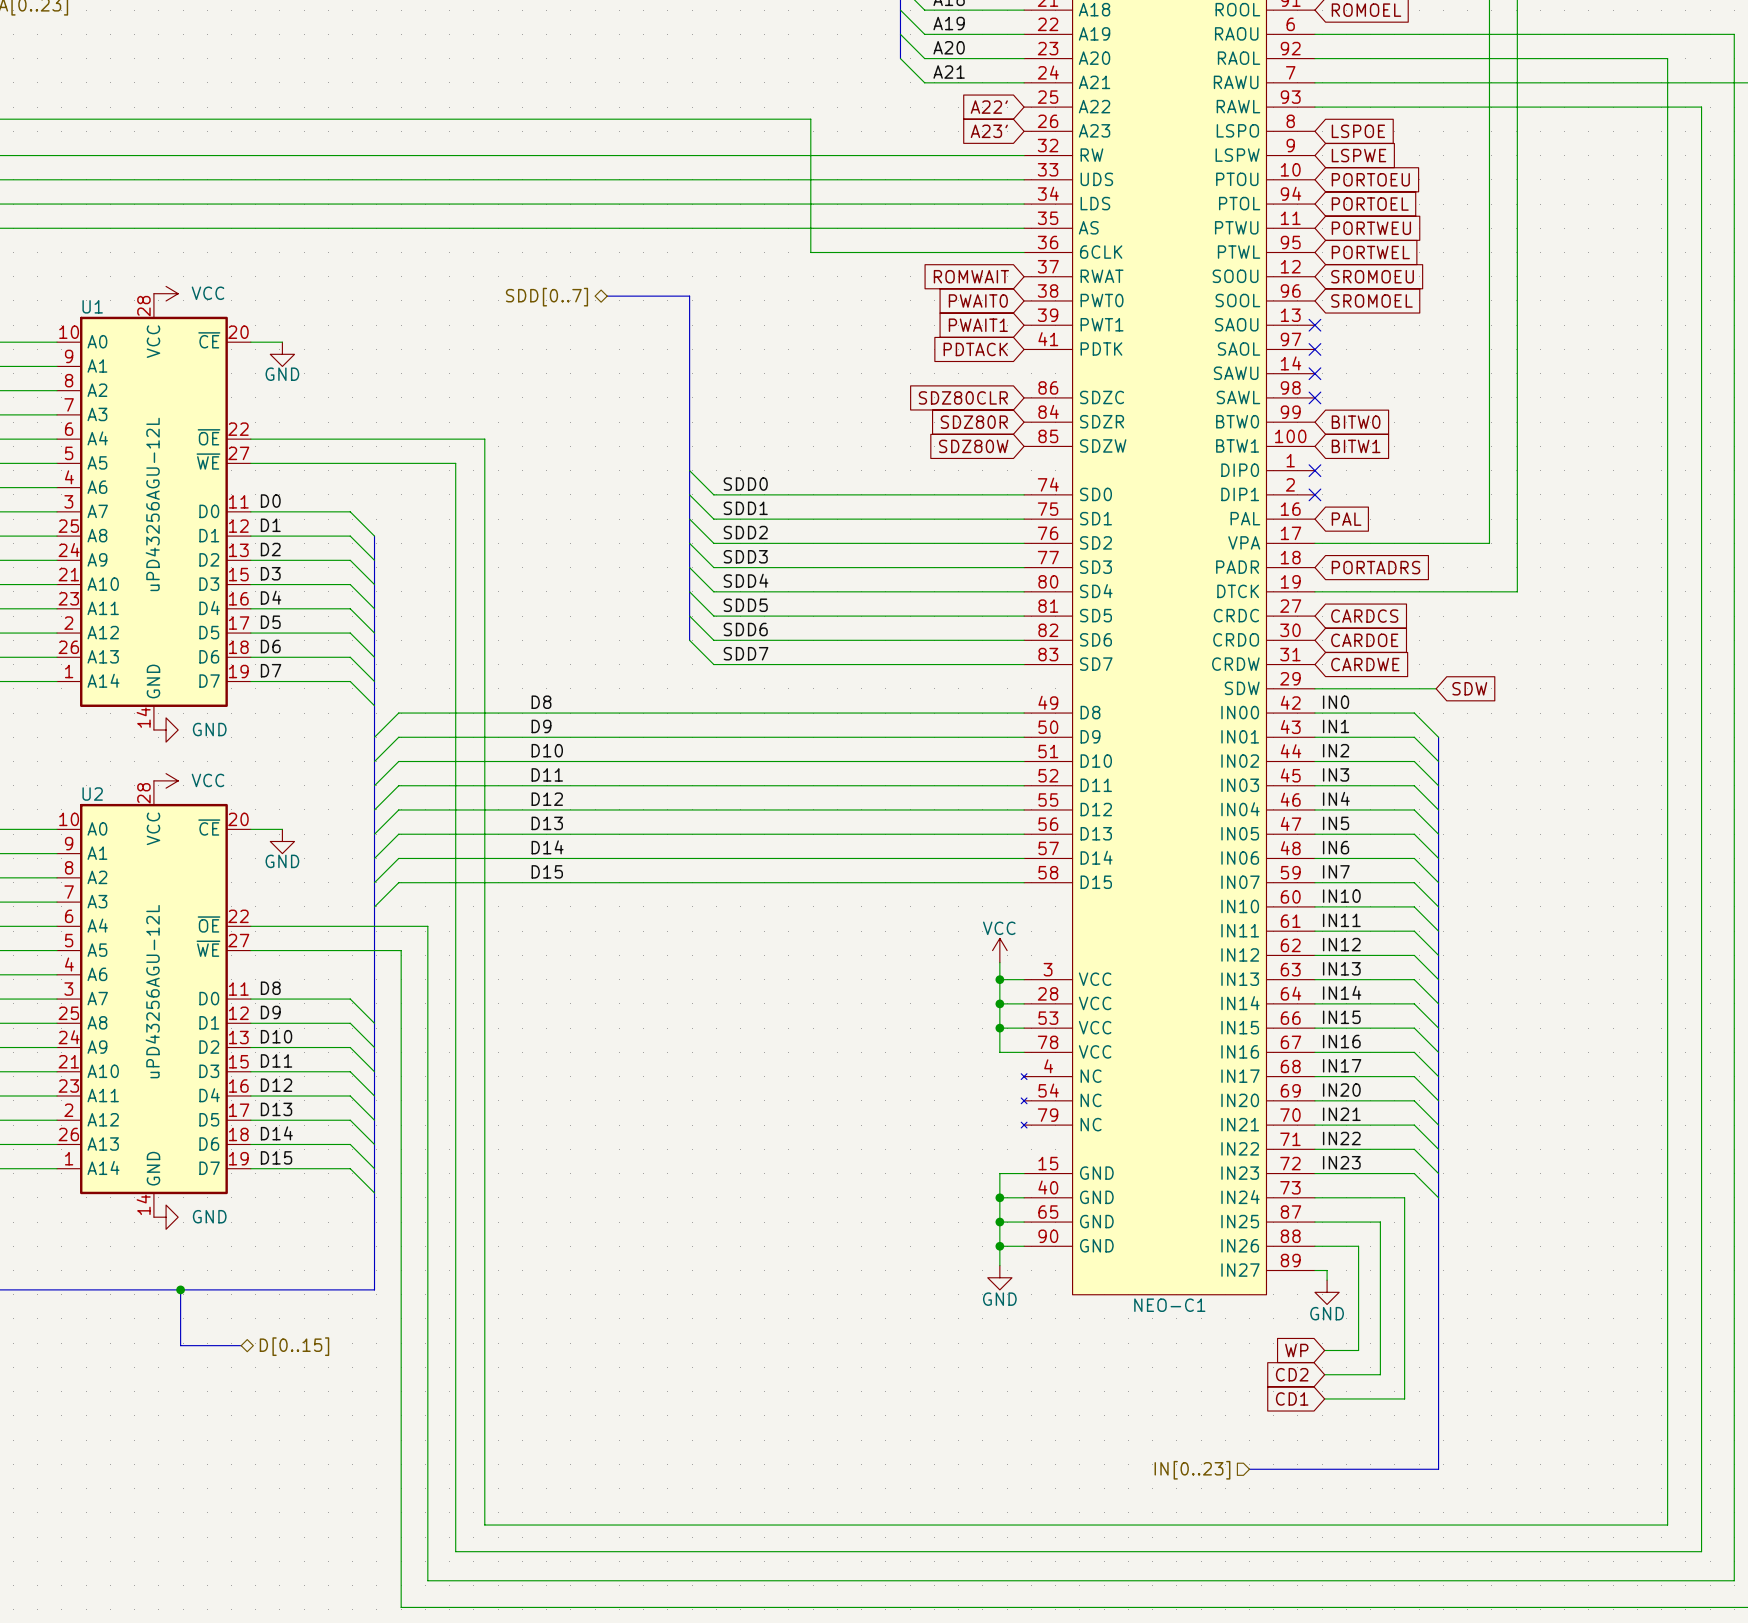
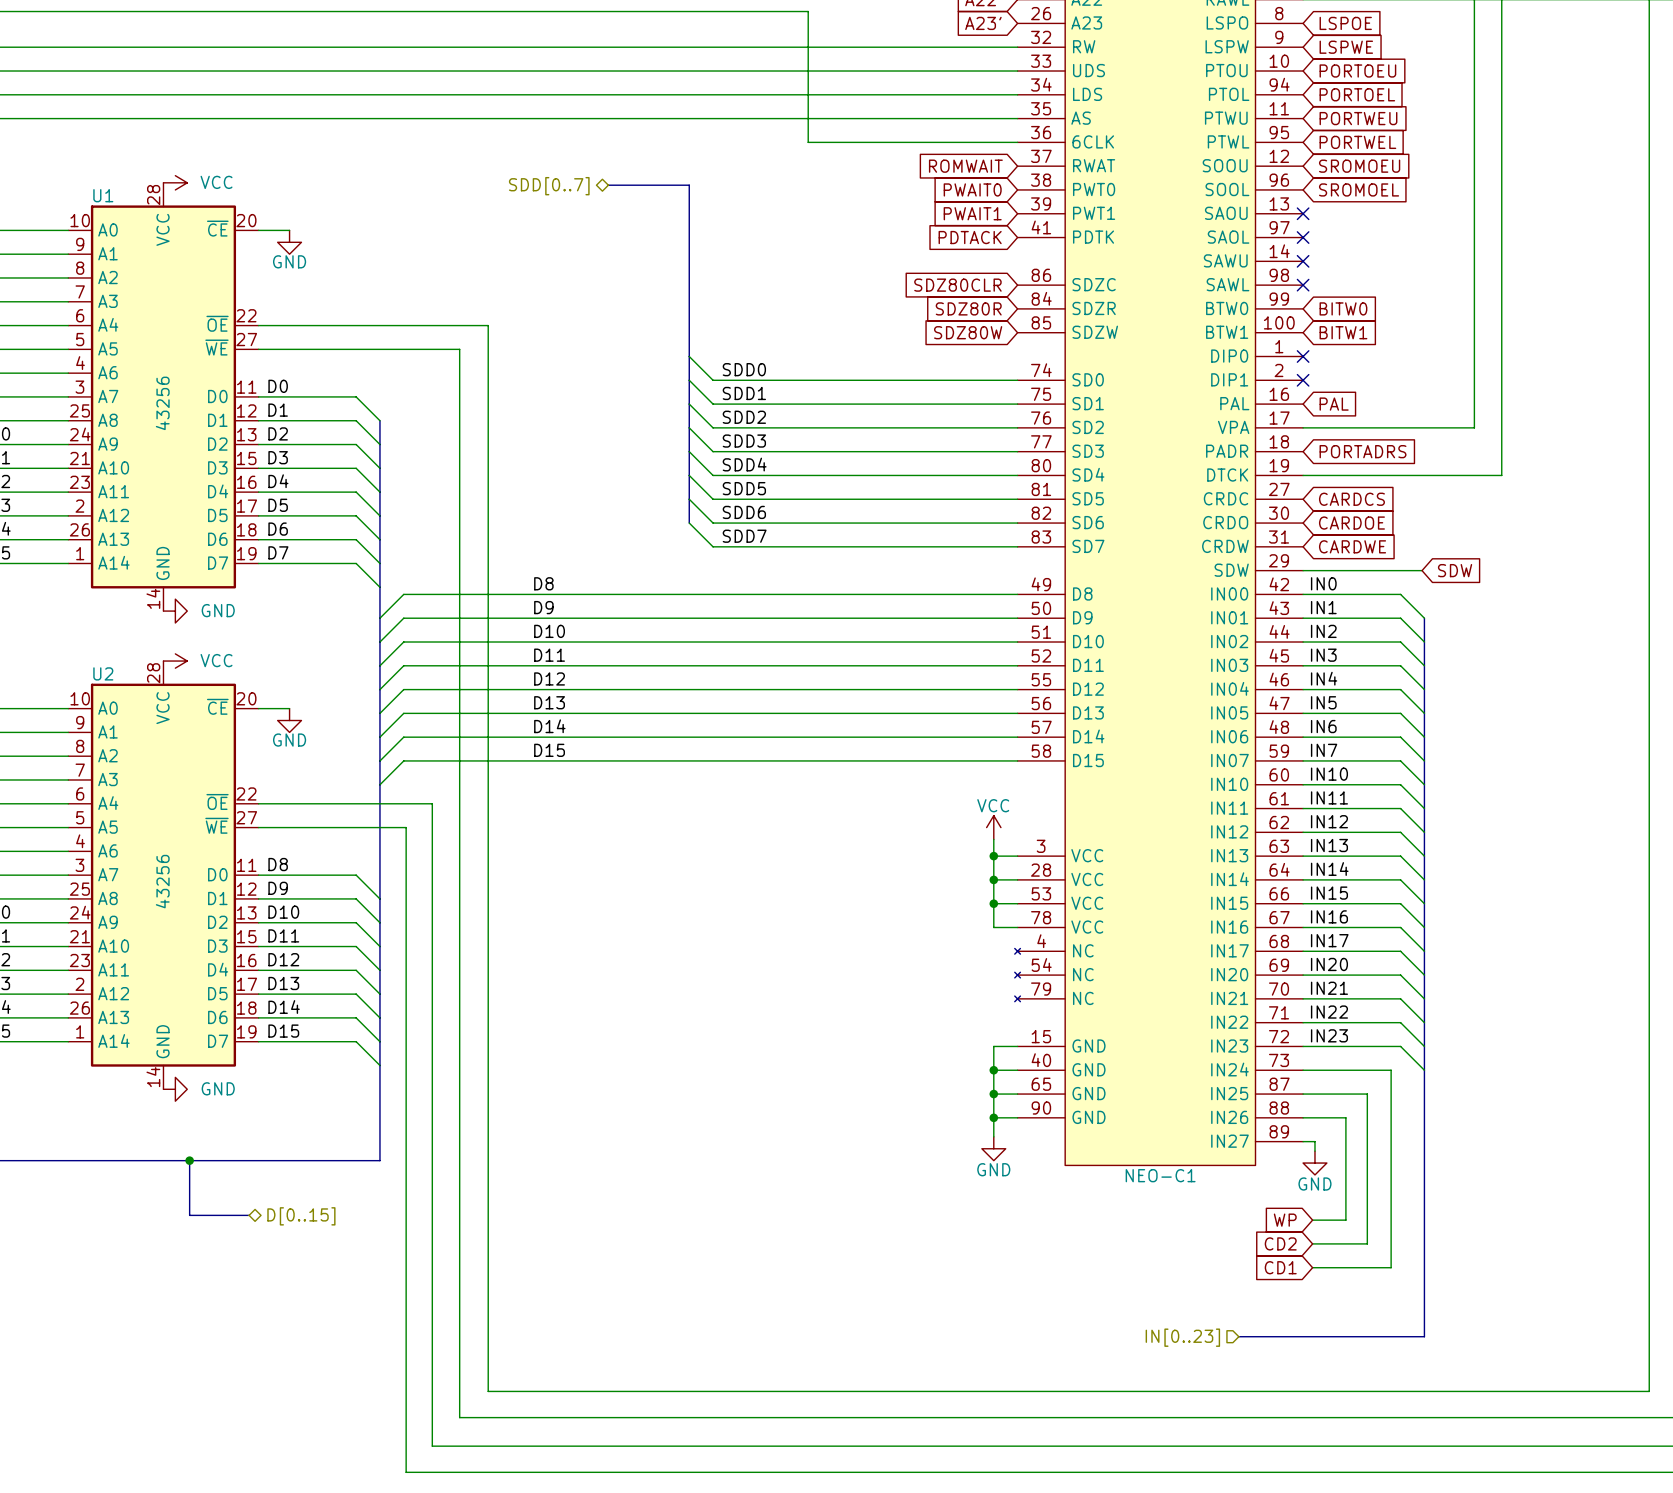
U1 value: uPD43256AGU-12L (152, 504) -> 43256 (162, 403)
U2 value: uPD43256AGU-12L (152, 991) -> 43256 (162, 881)

